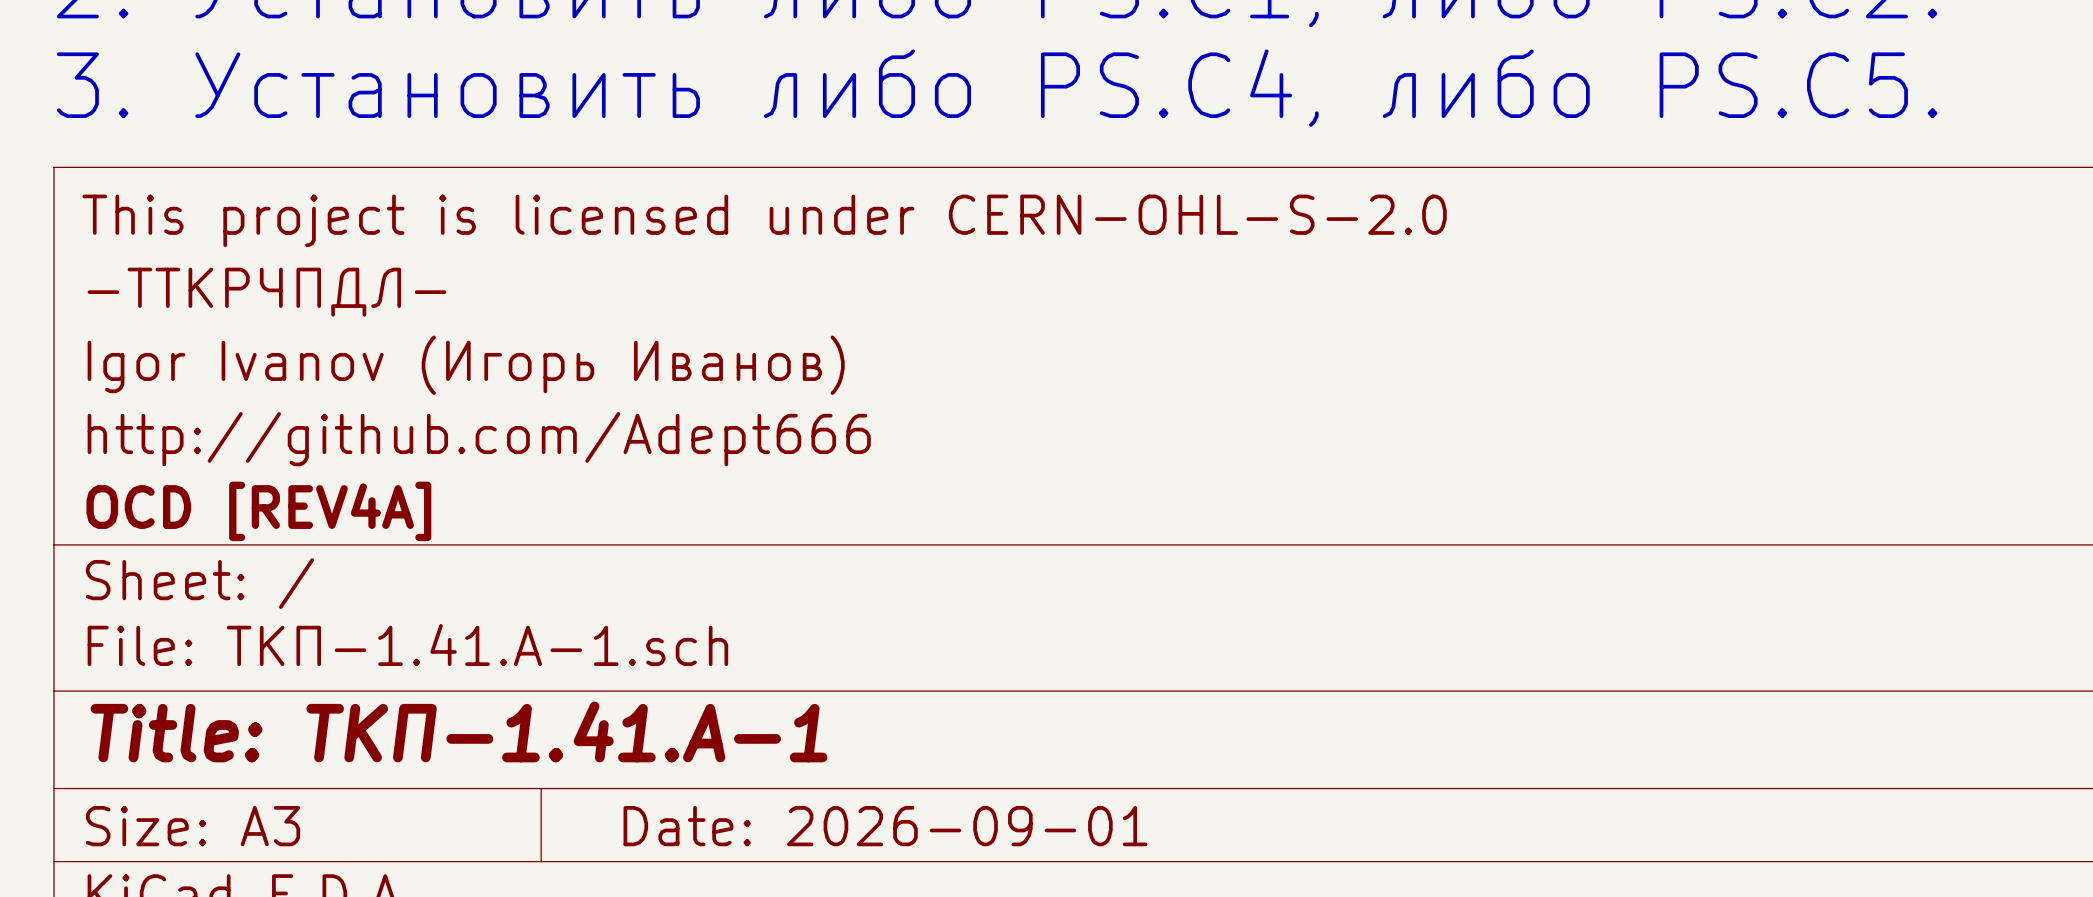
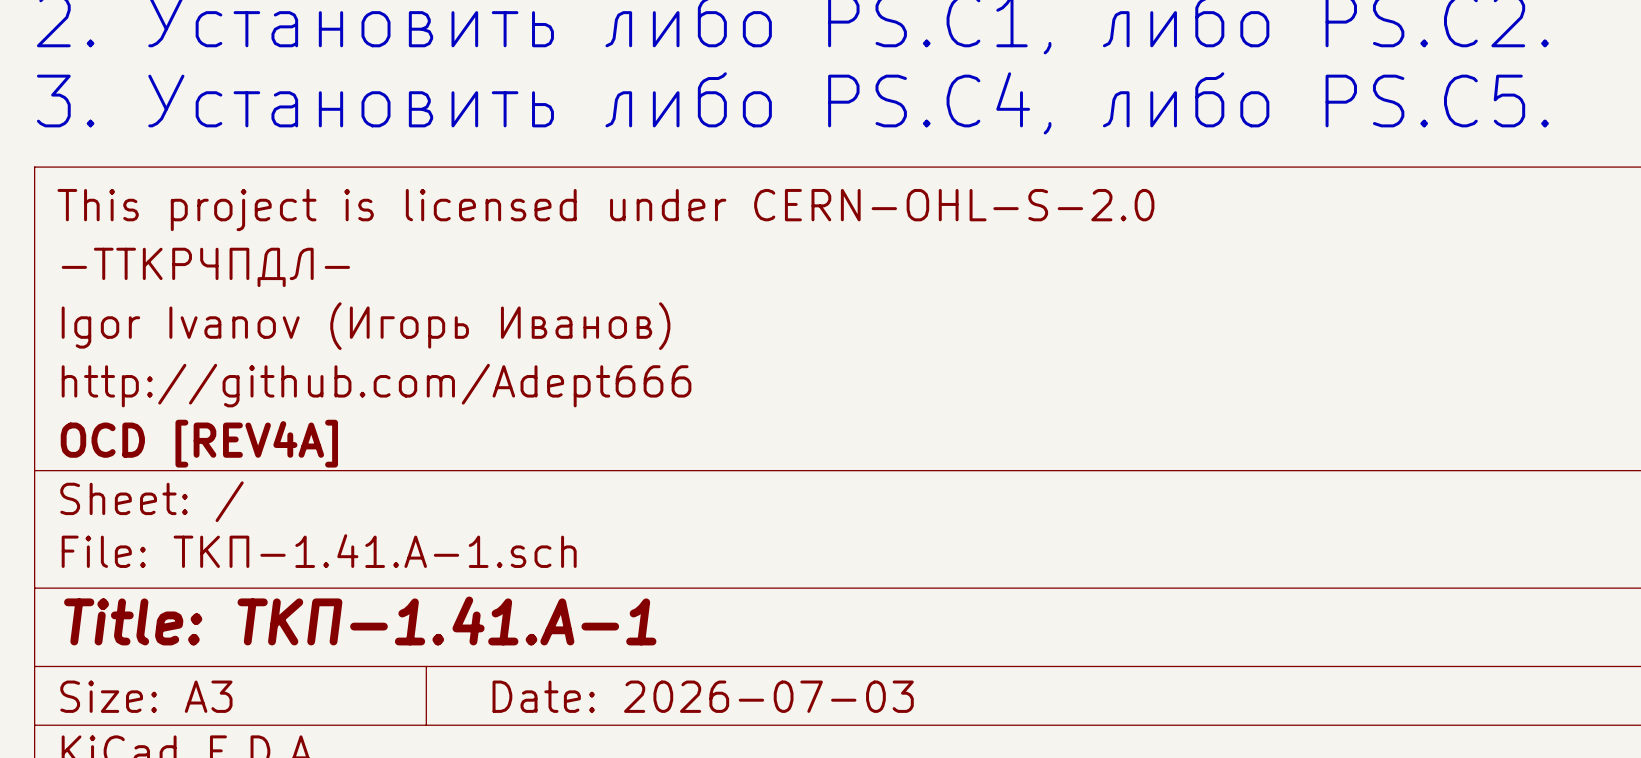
title block: Date: 2026-09-01 (885, 826) -> Date: 2026-07-03 (703, 696)

